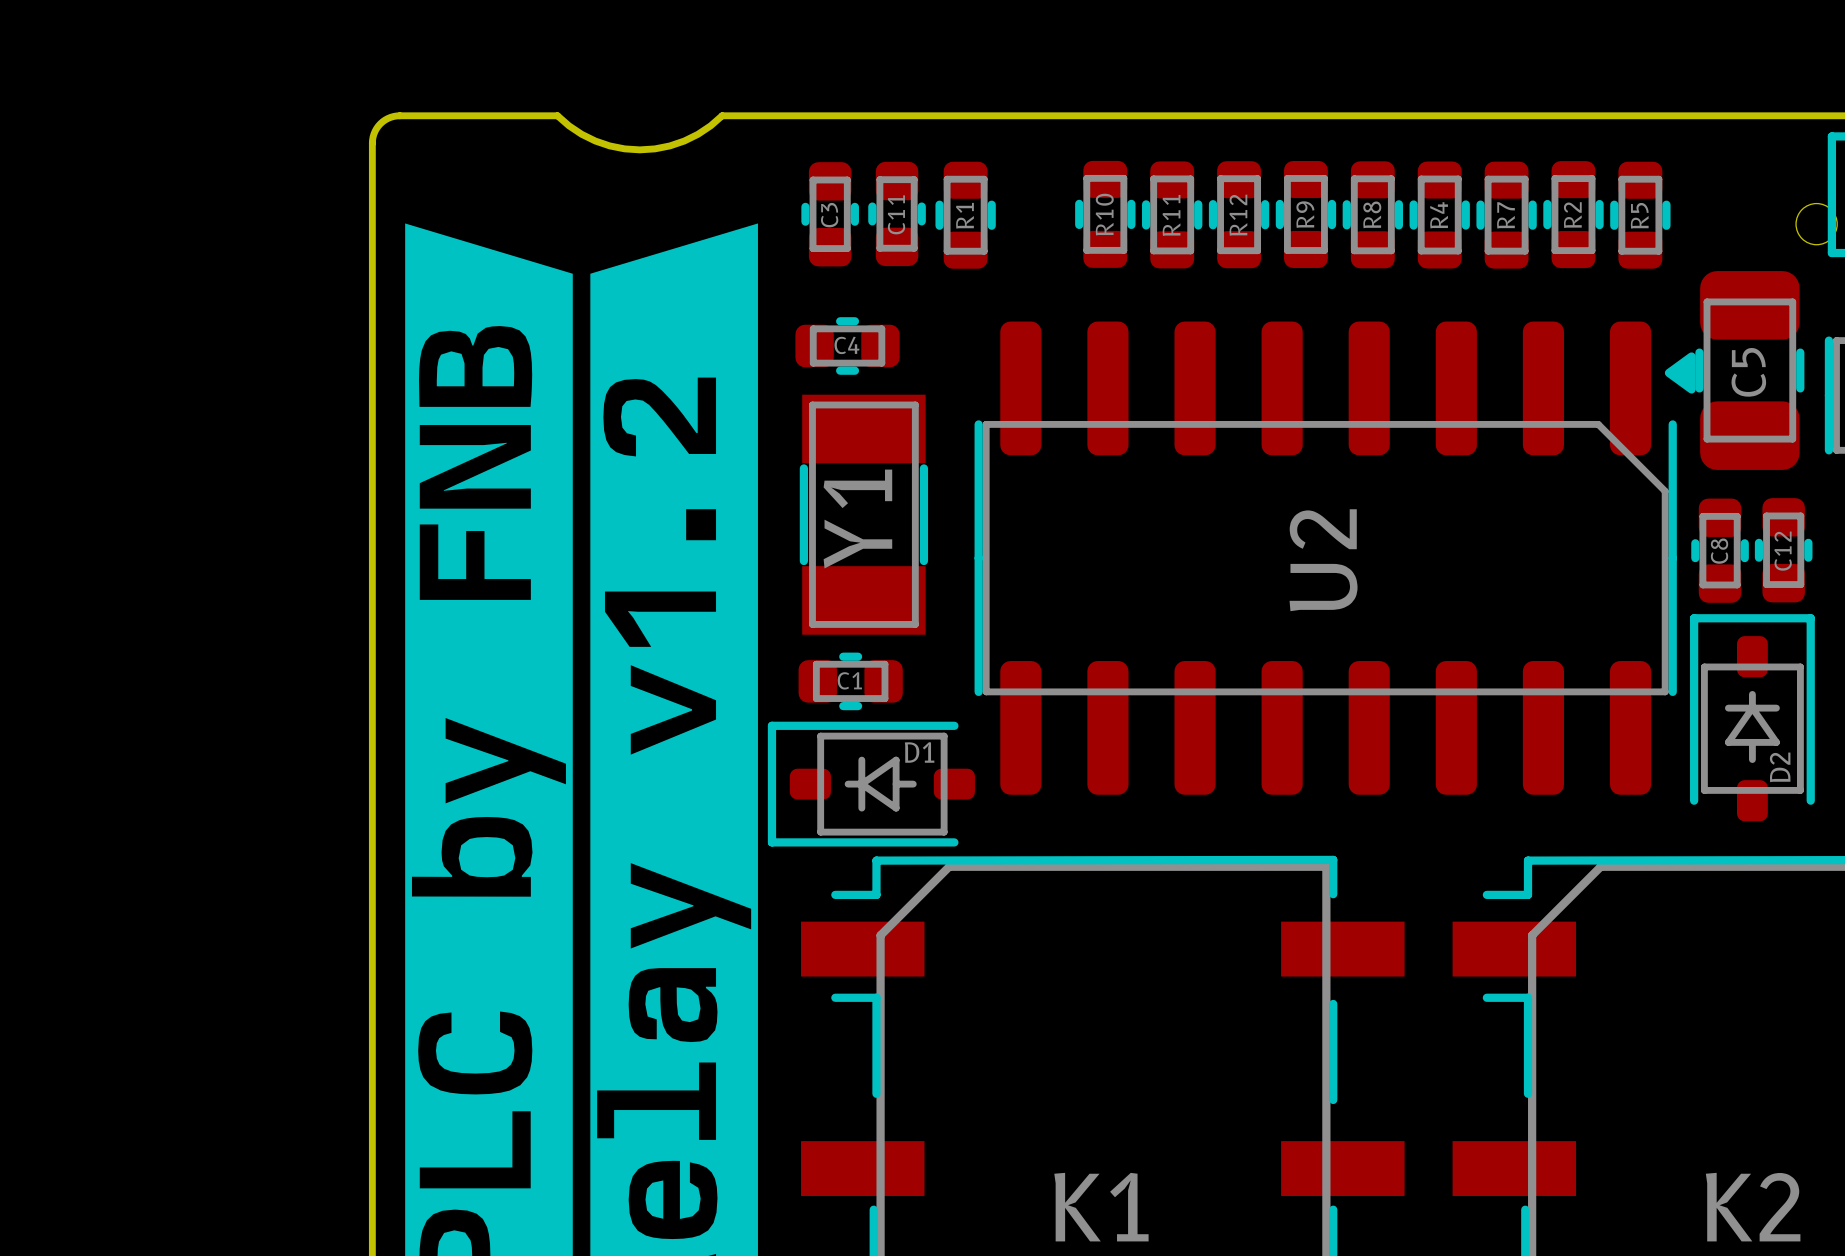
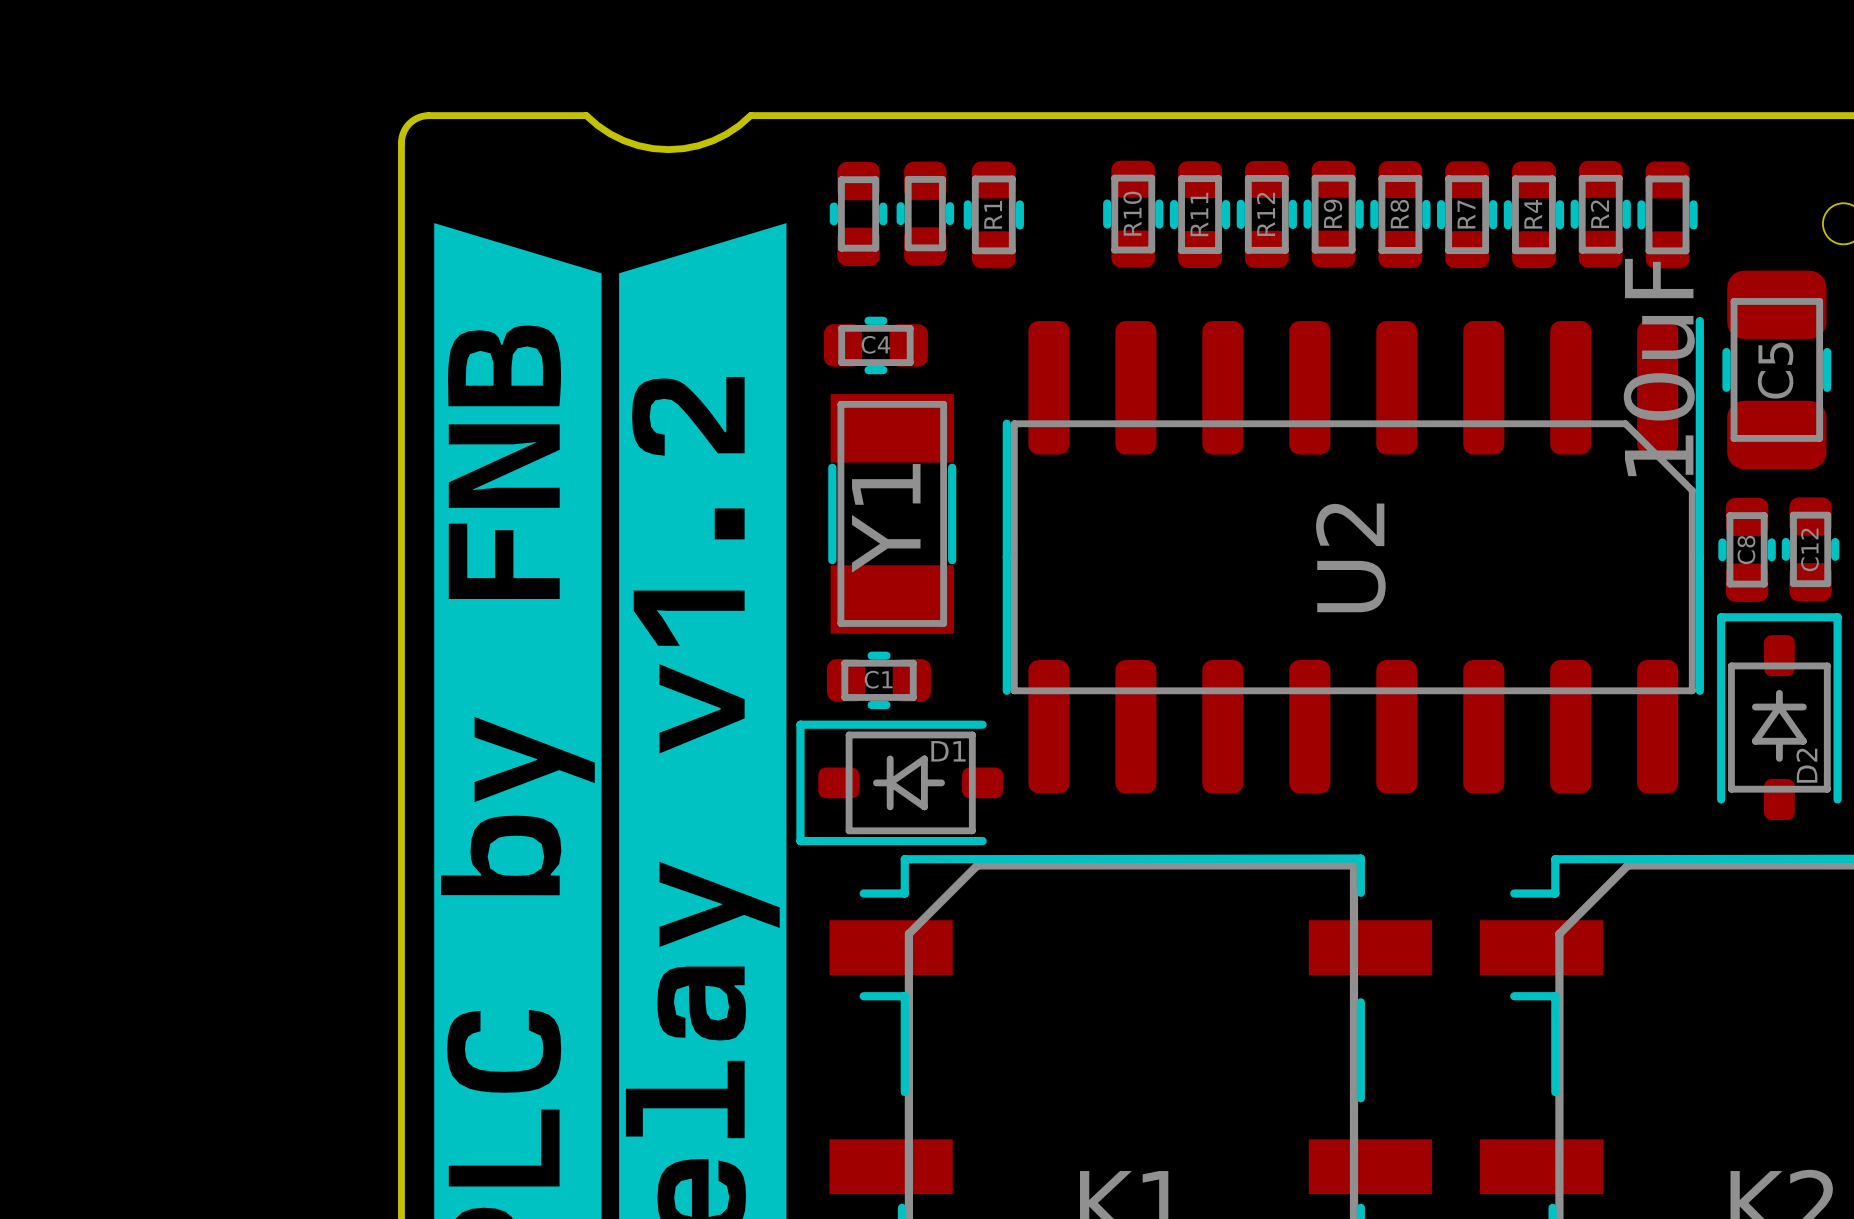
C11 name: C11 (896, 214) -> none
C3 name: C3 (829, 215) -> none
R4 name: R4 (1439, 215) -> R7 (1466, 214)
R7 name: R7 (1505, 215) -> R4 (1533, 214)
R5 name: R5 (1639, 215) -> none
U2 footprint: [974, 321, 1696, 795] -> [1002, 316, 1704, 794]
C5 value: none -> 10uF (1659, 367)

